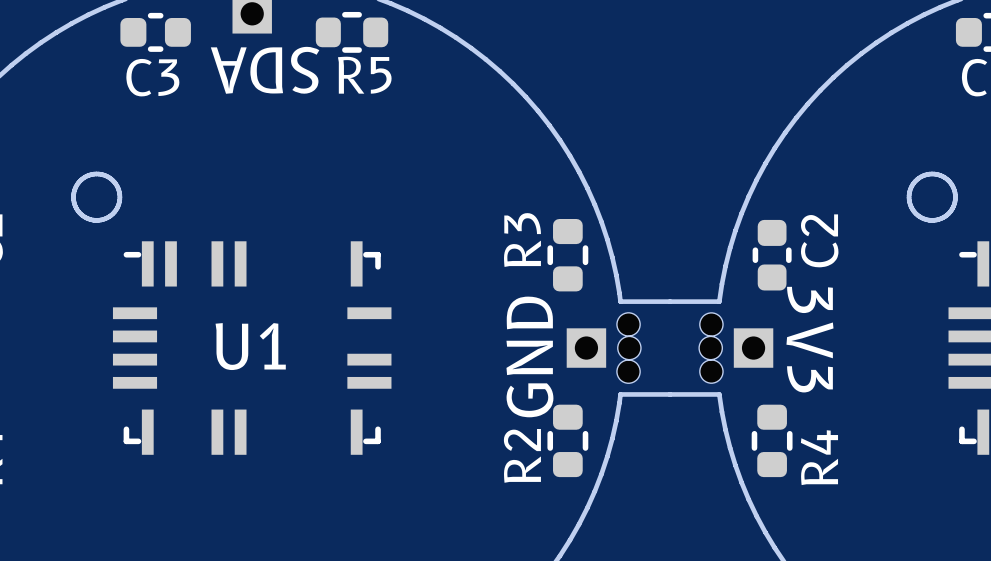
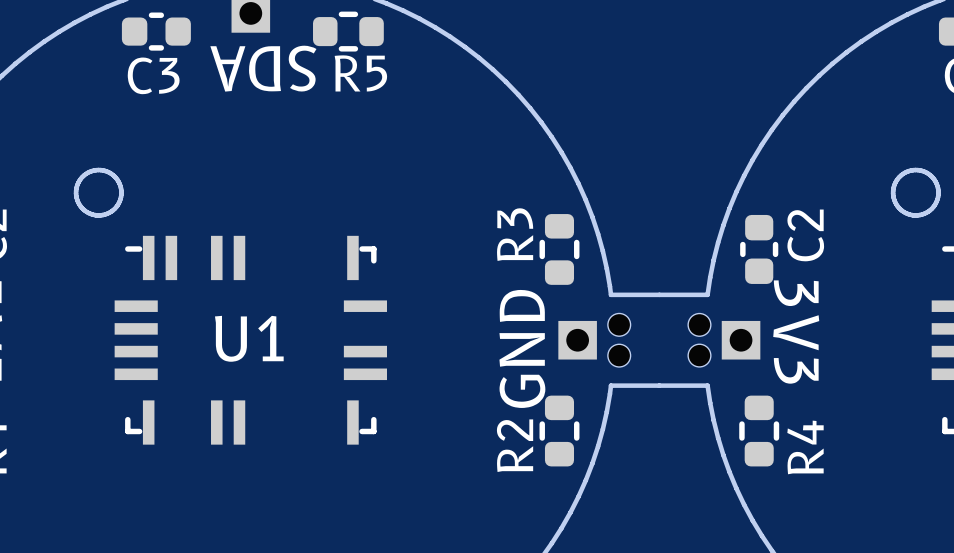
part: (628, 324) -> none
part: (711, 324) -> none
part: none -> (619, 324)
part: none -> (699, 324)
part: (629, 348) -> none
part: (710, 348) -> none
part: none -> (619, 355)
part: none -> (699, 355)
part: (628, 371) -> none
part: (711, 371) -> none

